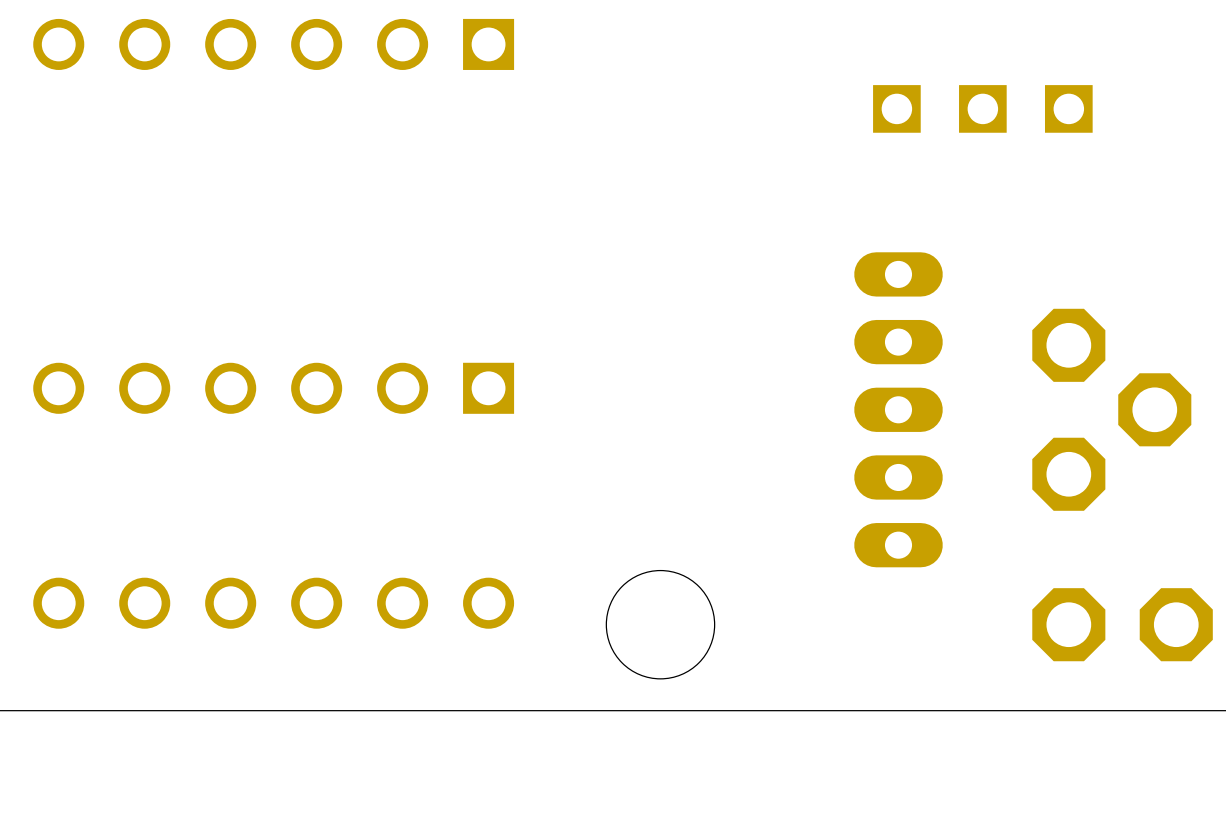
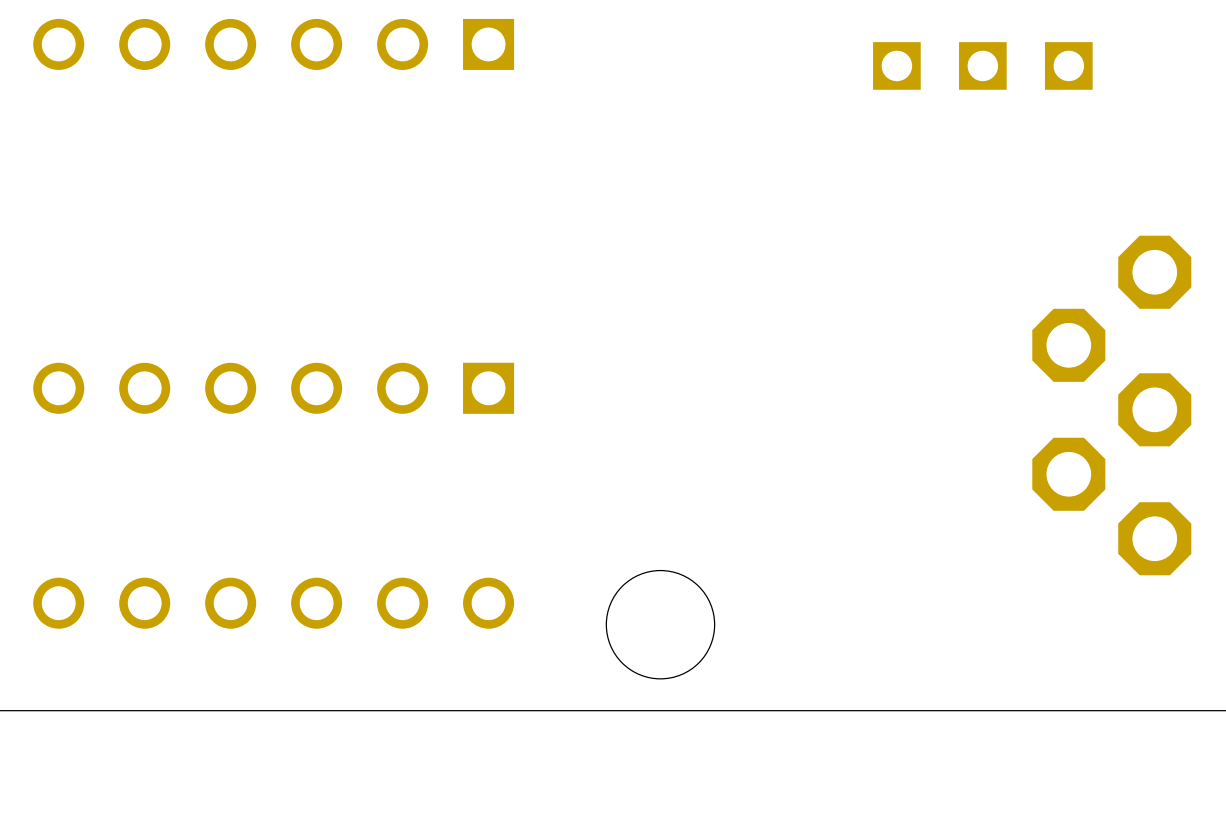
part position: (982, 108) -> (982, 65)
part: none -> (1154, 272)
part: (898, 409) -> none
part: none -> (1154, 538)
part: (1068, 624) -> none
part: (1176, 624) -> none

